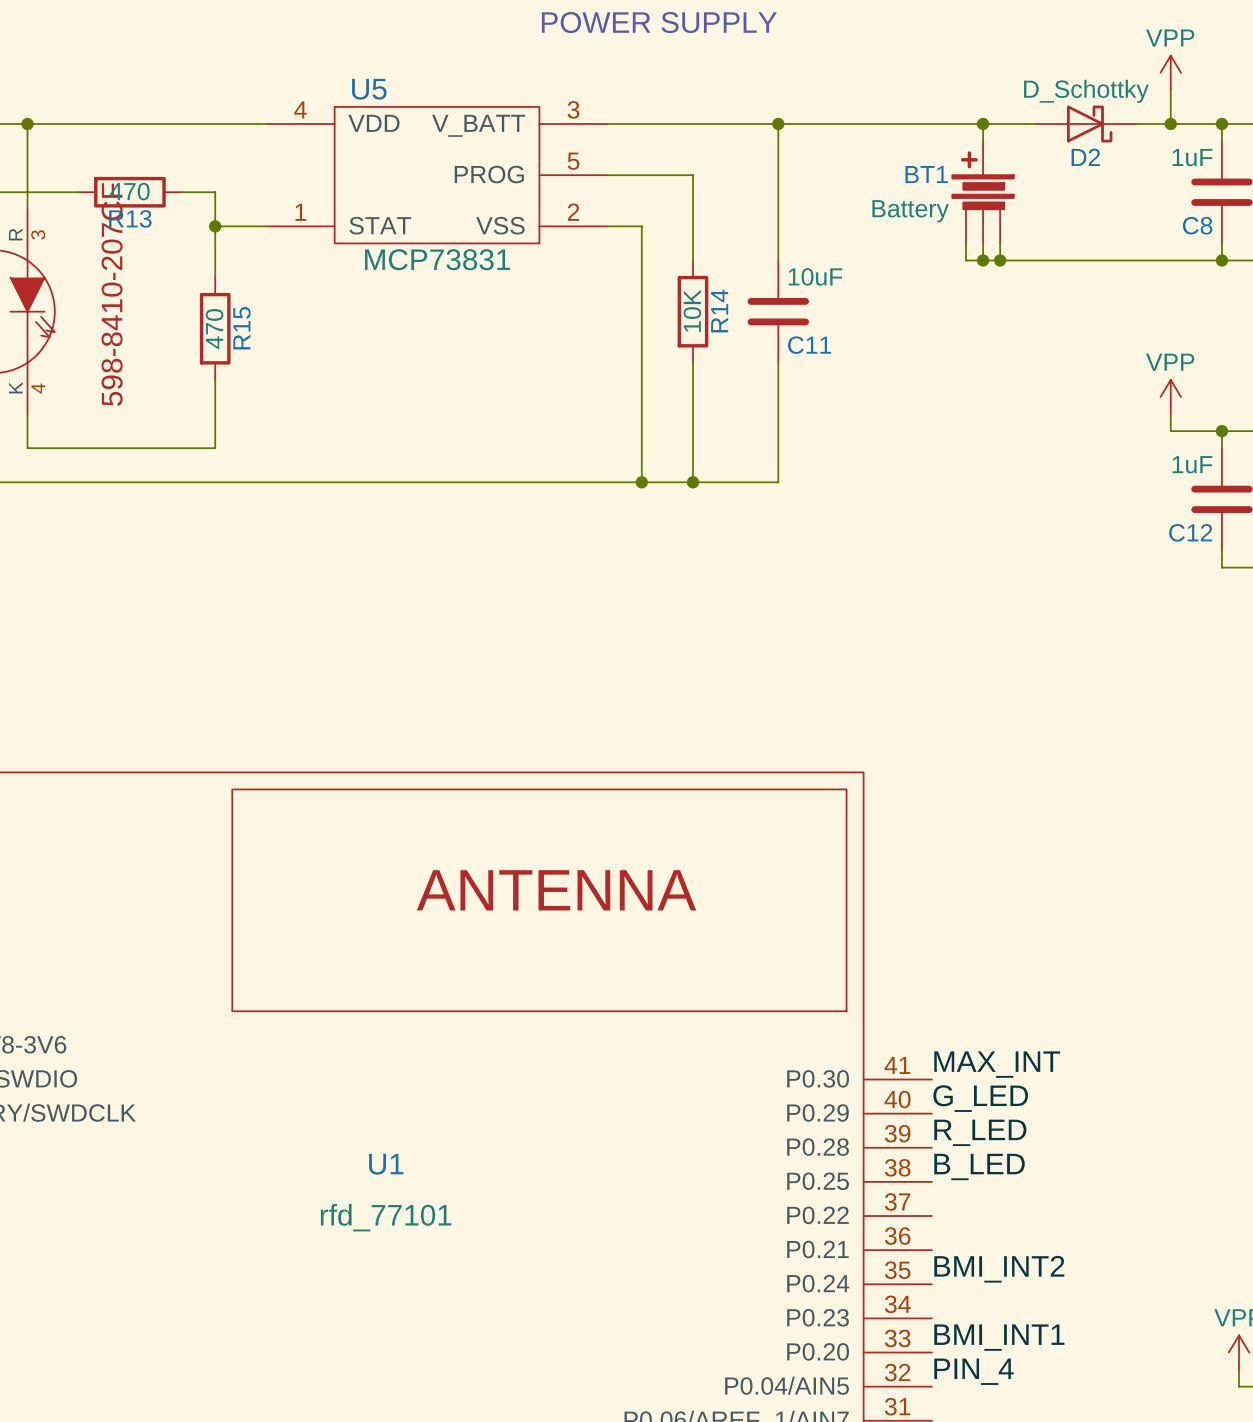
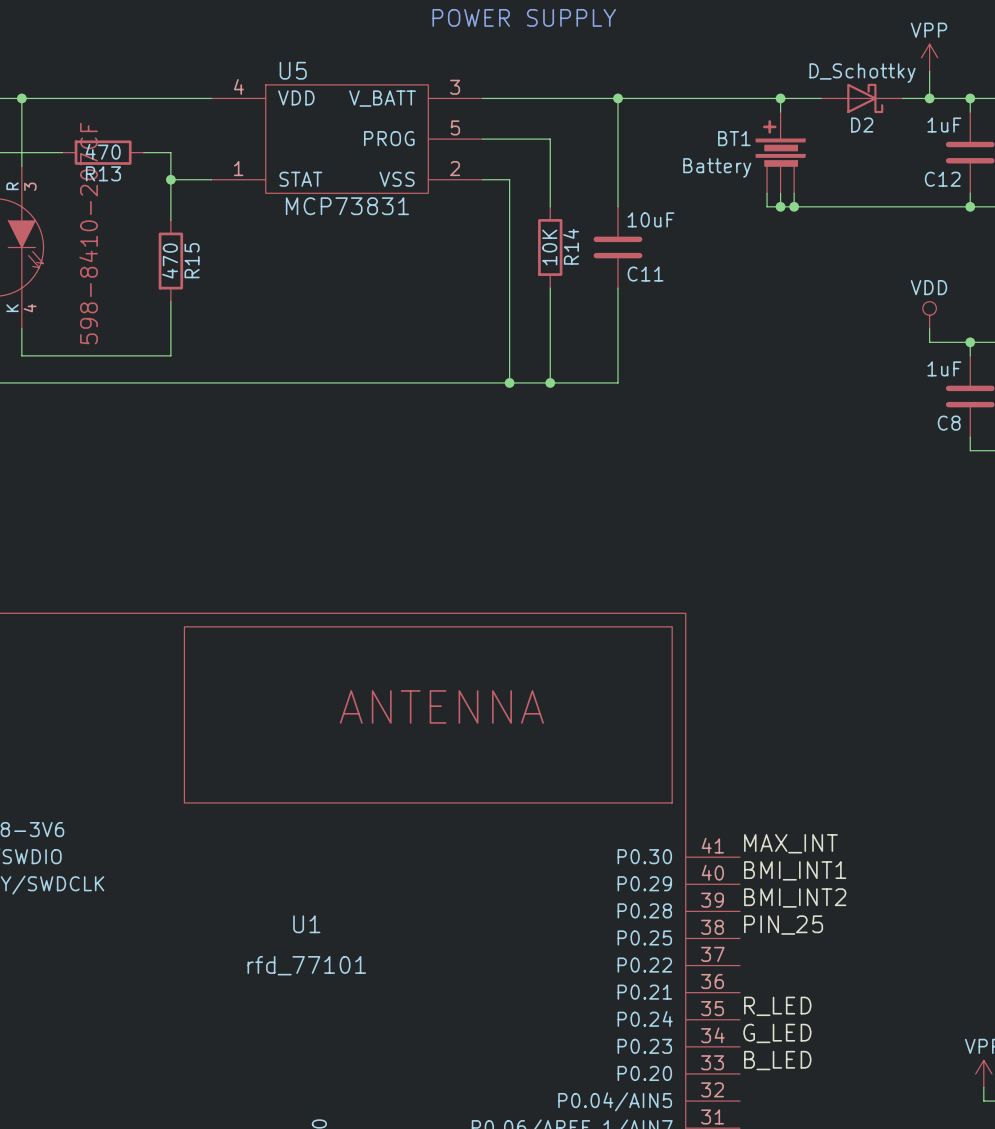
C8 name: C8 (1197, 225) -> C12 (942, 179)
power symbol: VPP (1170, 396) -> VDD (929, 315)
C12 name: C12 (1190, 532) -> C8 (949, 423)
label: G_LED (980, 1098) -> BMI_INT1 (795, 870)
label: R_LED (980, 1132) -> BMI_INT2 (795, 897)
label: B_LED (979, 1166) -> PIN_25 (783, 925)
label: BMI_INT2 (999, 1269) -> R_LED (777, 1006)
label: none -> G_LED (777, 1033)
label: BMI_INT1 (999, 1337) -> B_LED (777, 1060)
label: PIN_4 (974, 1371) -> none

